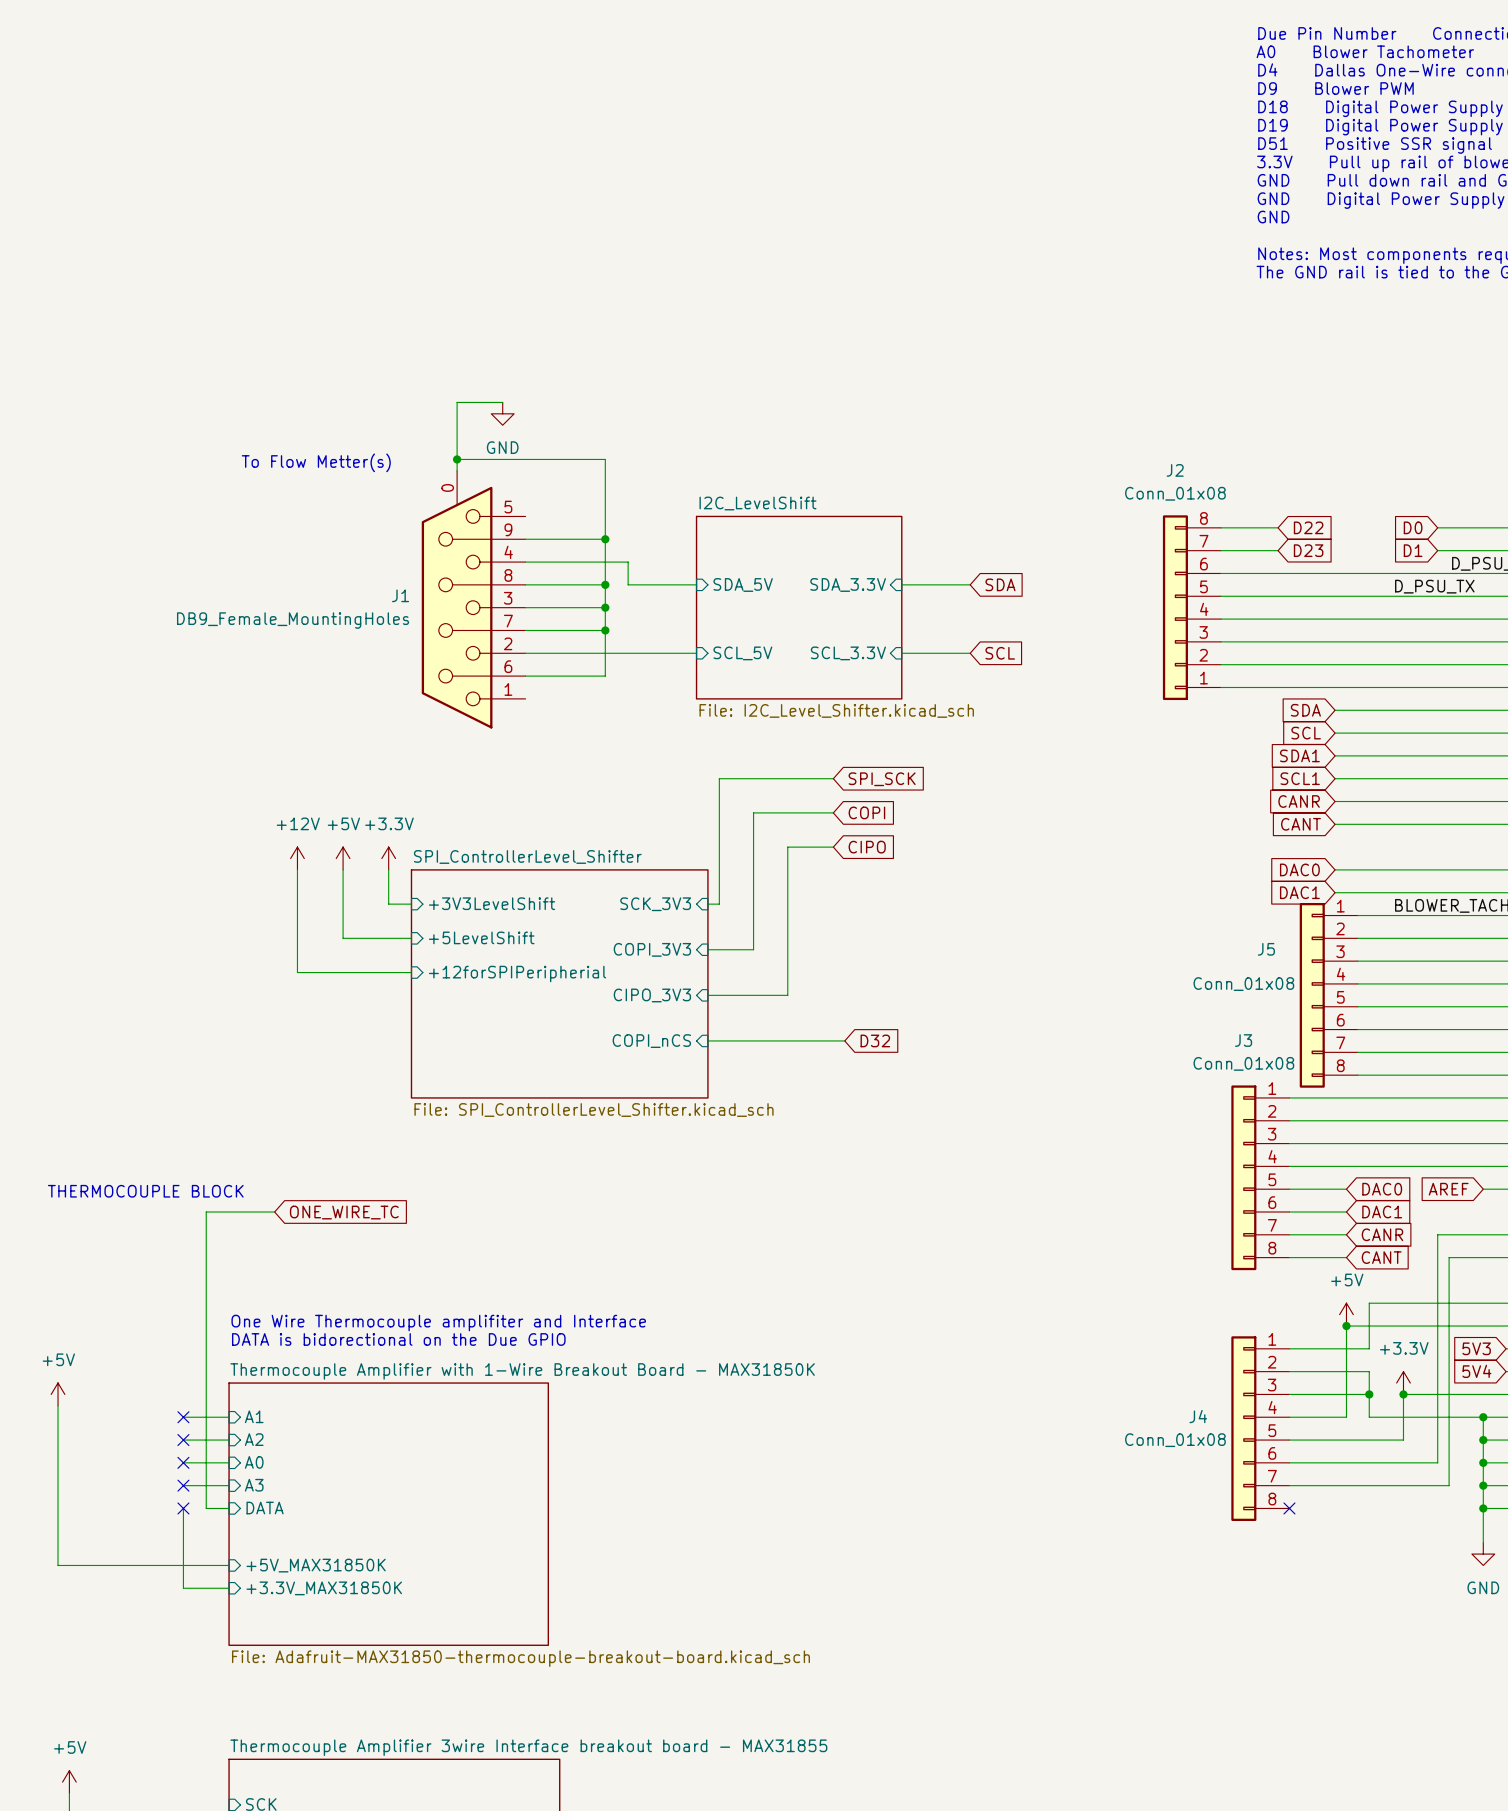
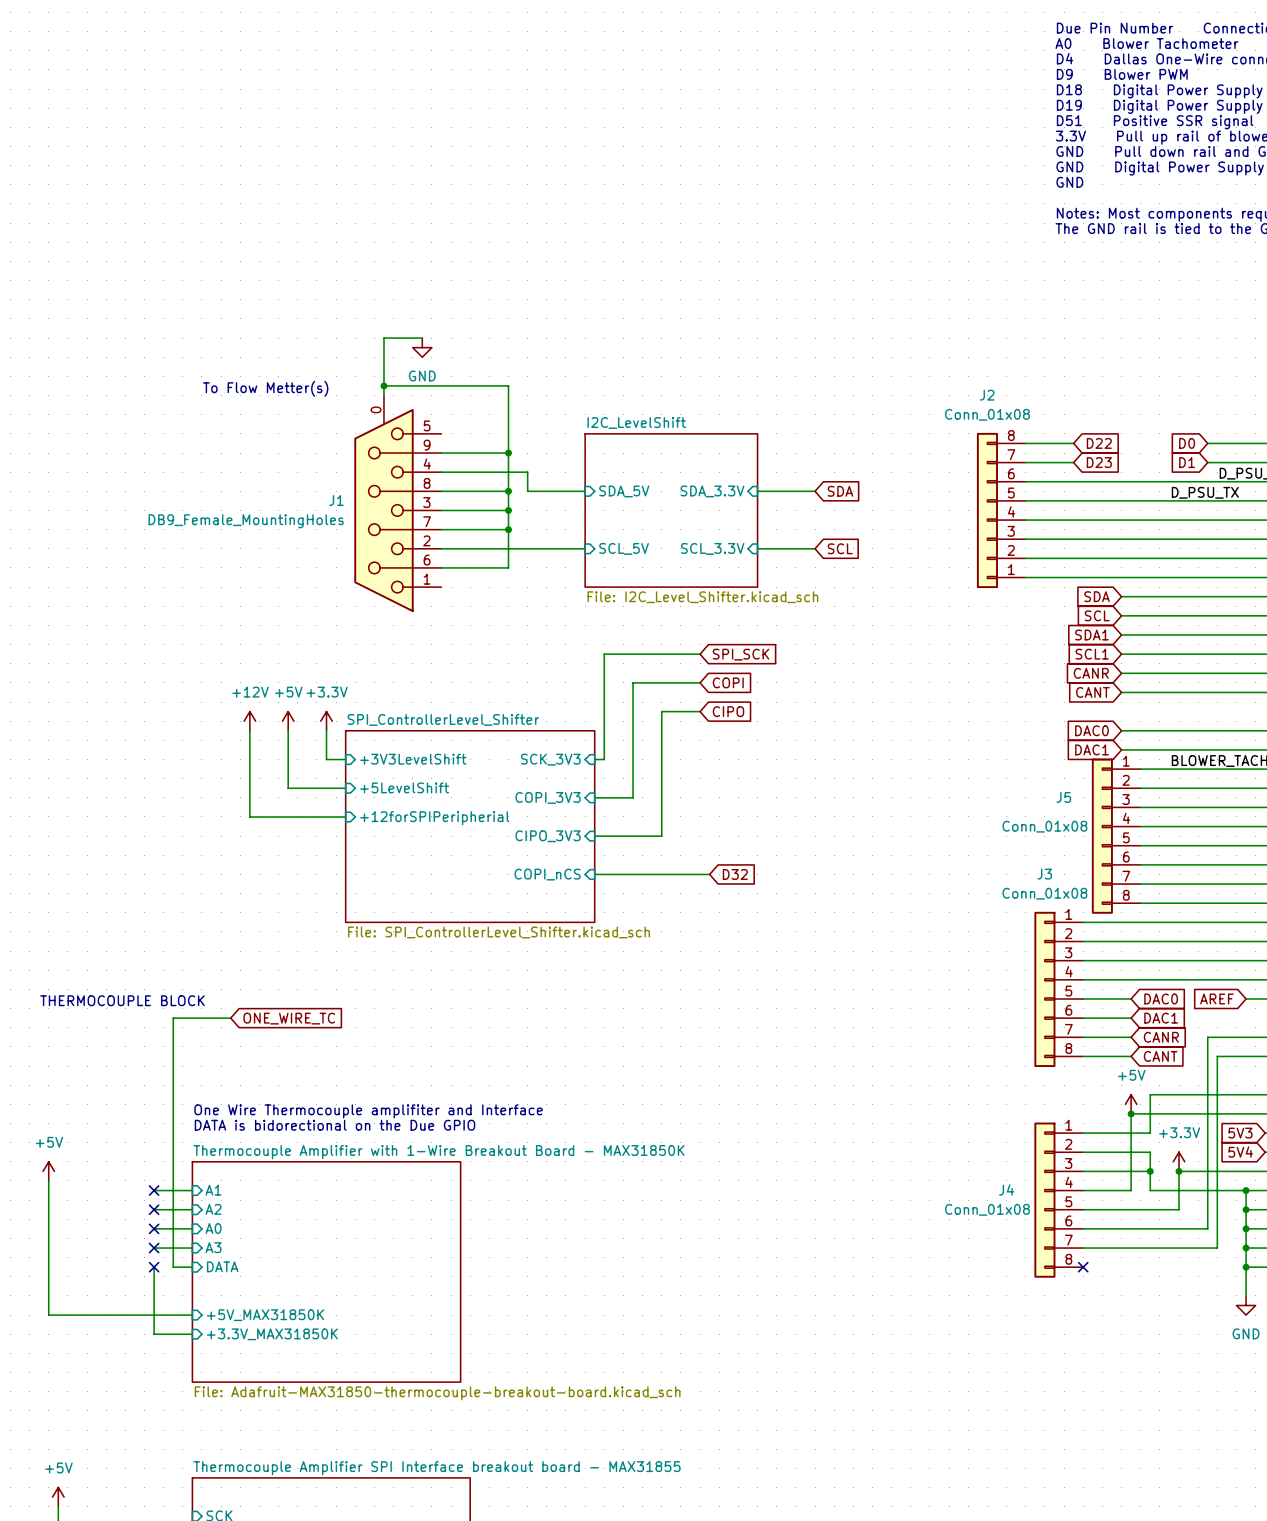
sheet Thermocouple Amplifier 3wire Interface breakout board - MAX31855 name: Thermocouple Amplifier 3wire Interface breakout board - MAX31855 (528, 1747) -> Thermocouple Amplifier SPI Interface breakout board - MAX31855 (436, 1468)

